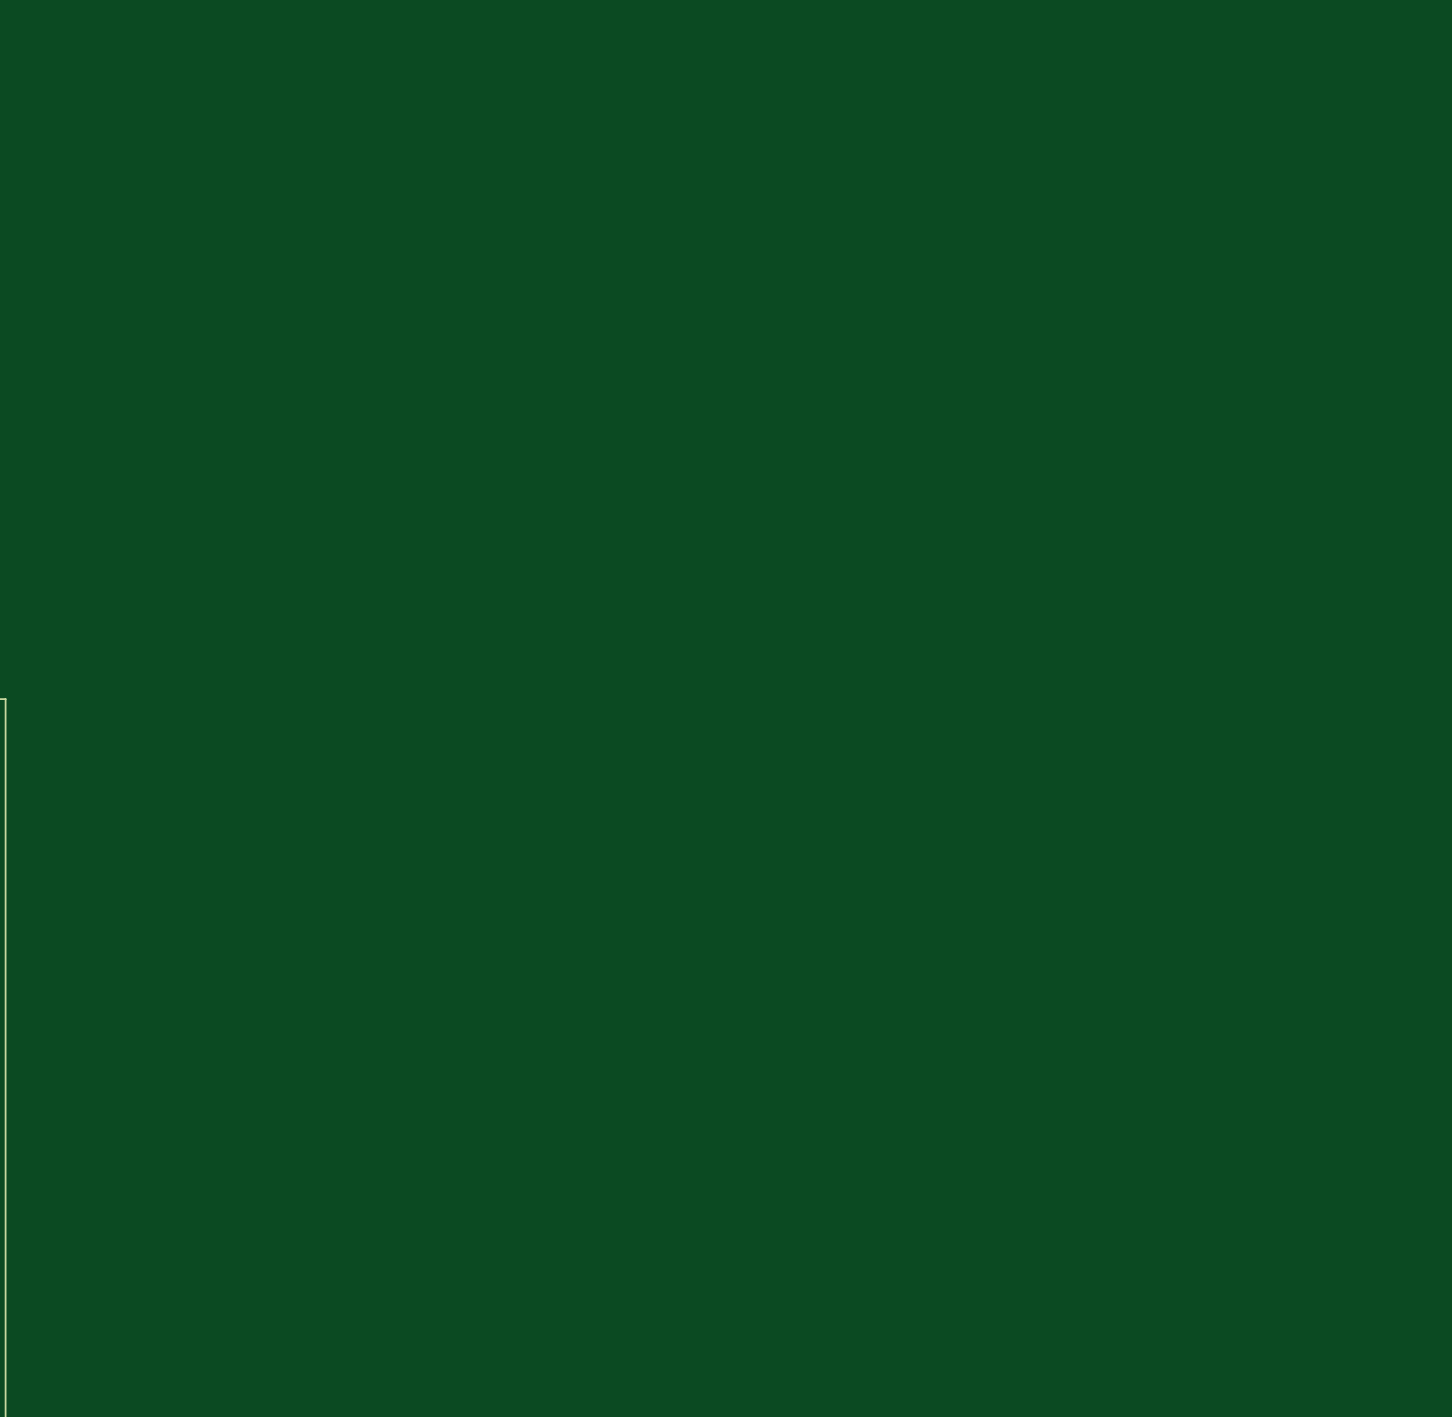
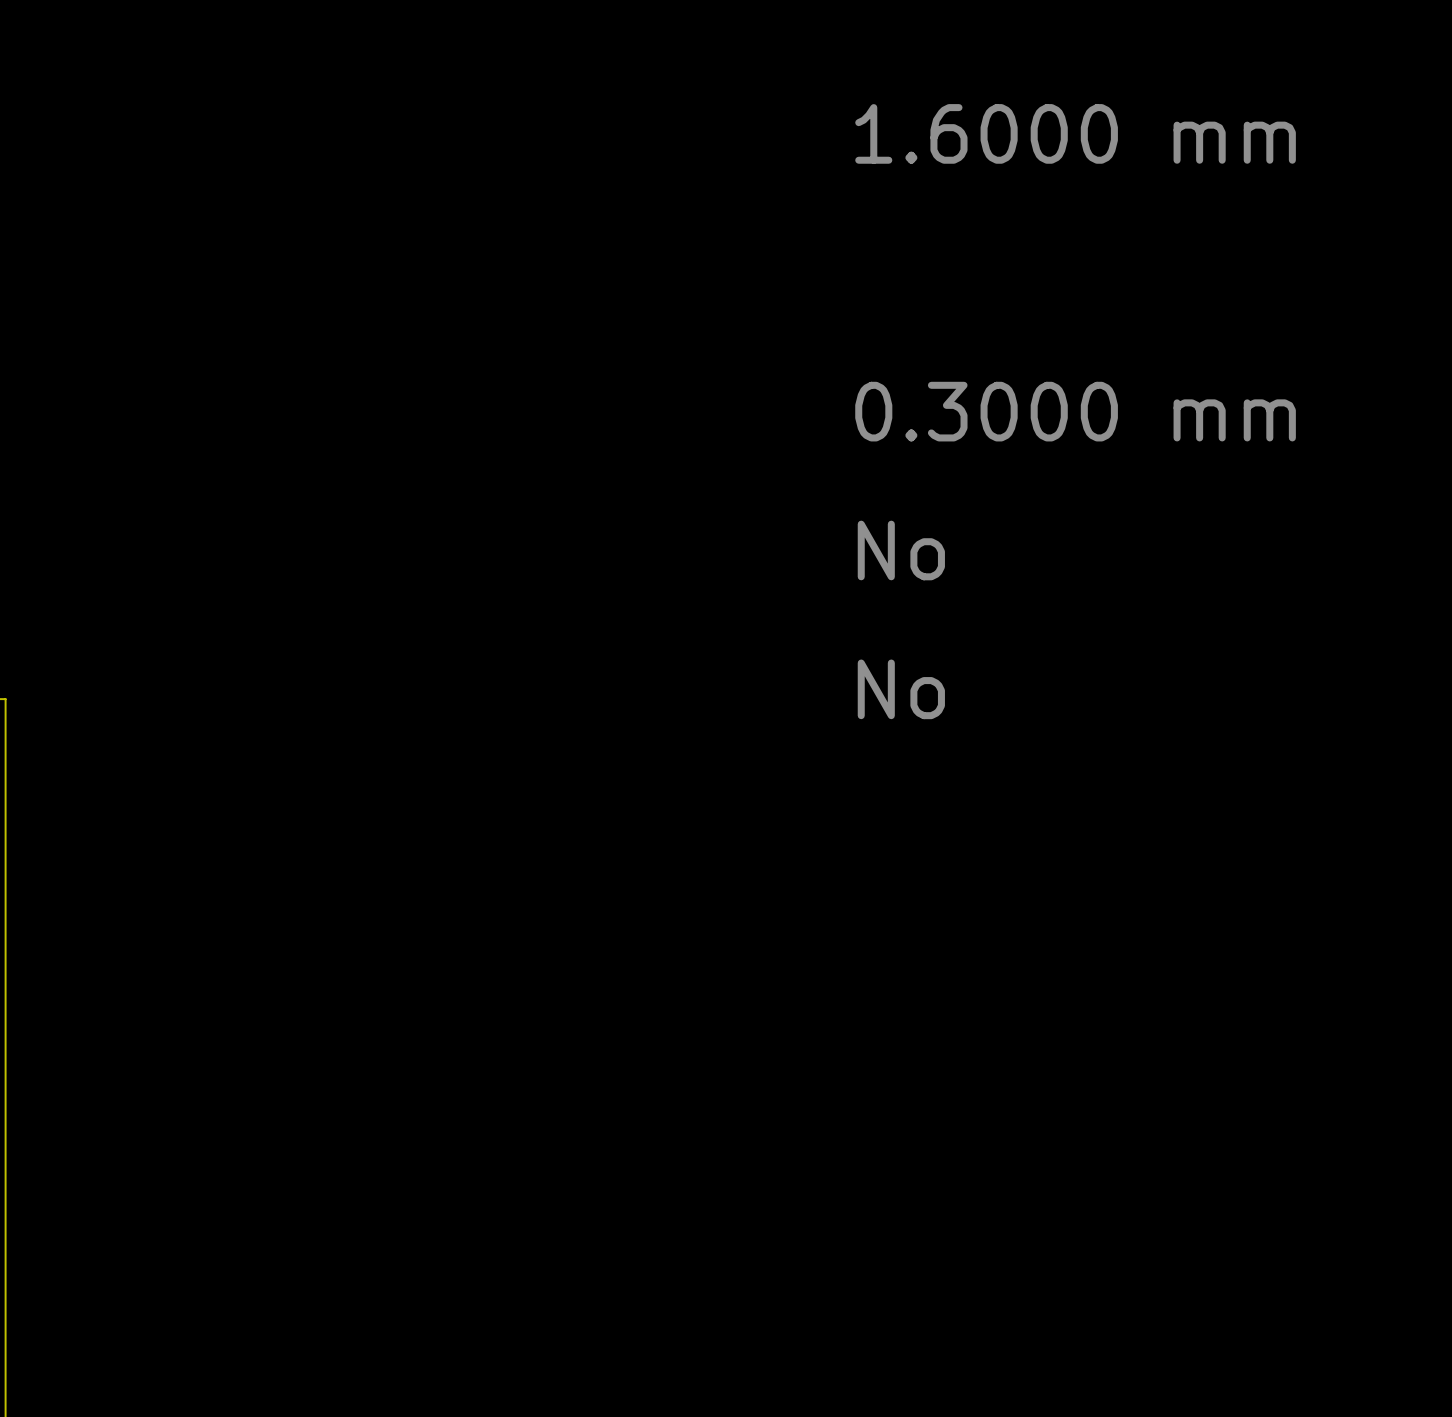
text: none -> 1.6000 mm (1075, 133)
text: none -> 0.3000 mm (1075, 411)
text: none -> No (901, 550)
text: none -> No (901, 689)

